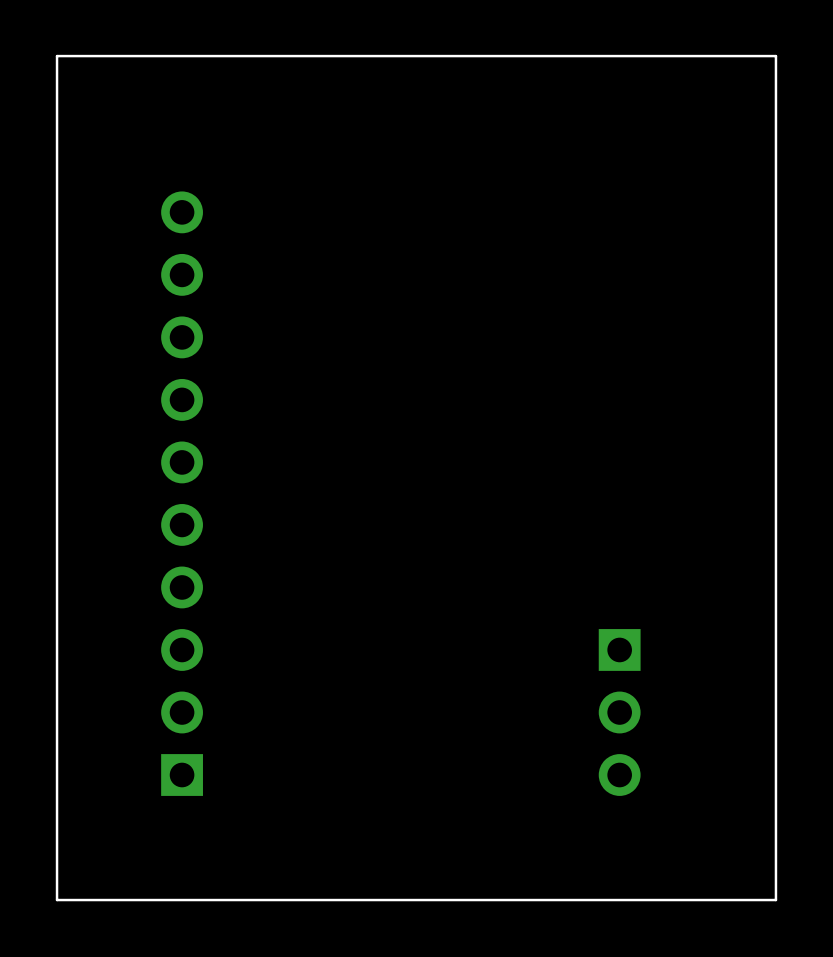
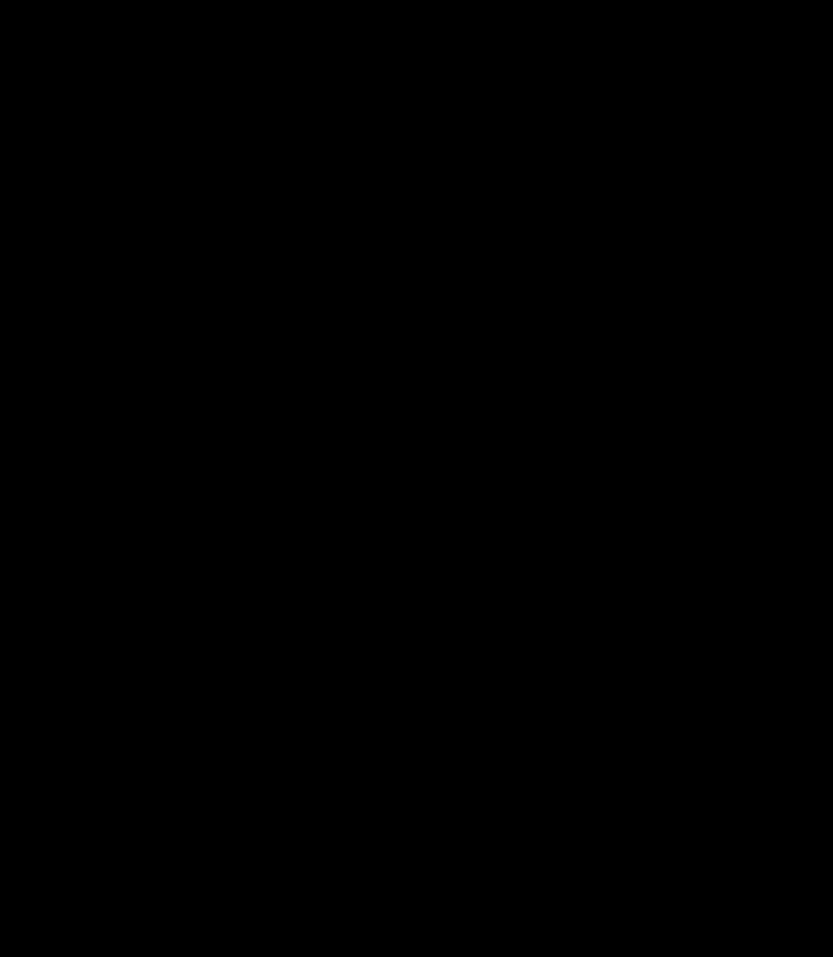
board edge: (775, 56) (57, 56) (57, 900) (775, 900) (775, 56) -> none
part: (182, 493) -> none
part: (619, 712) -> none

